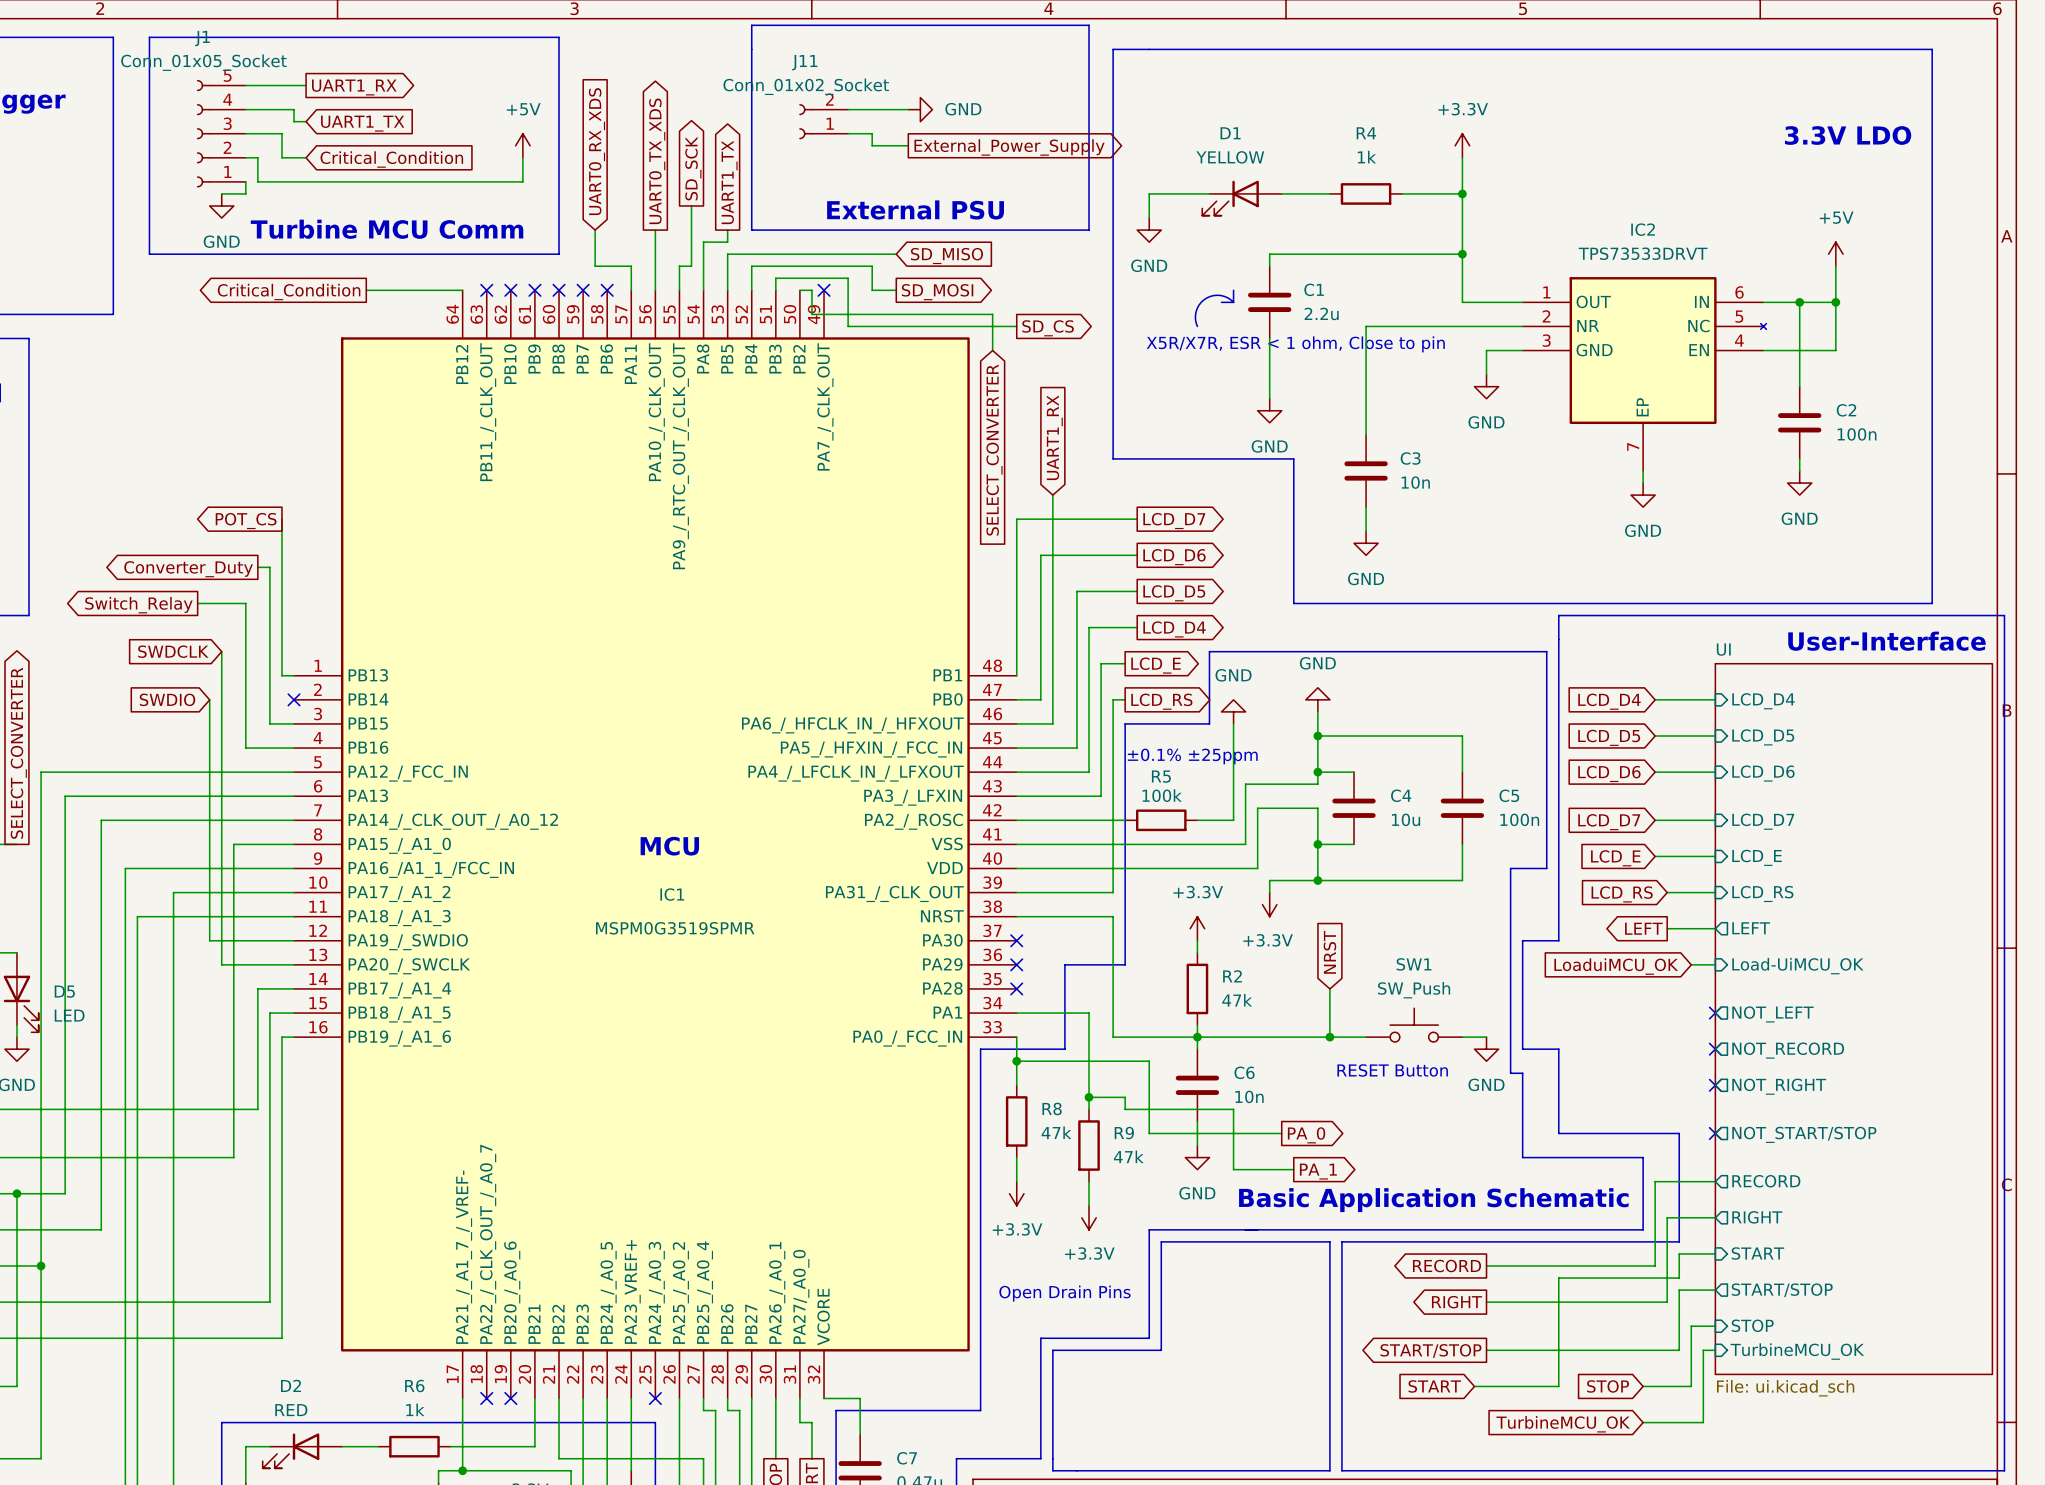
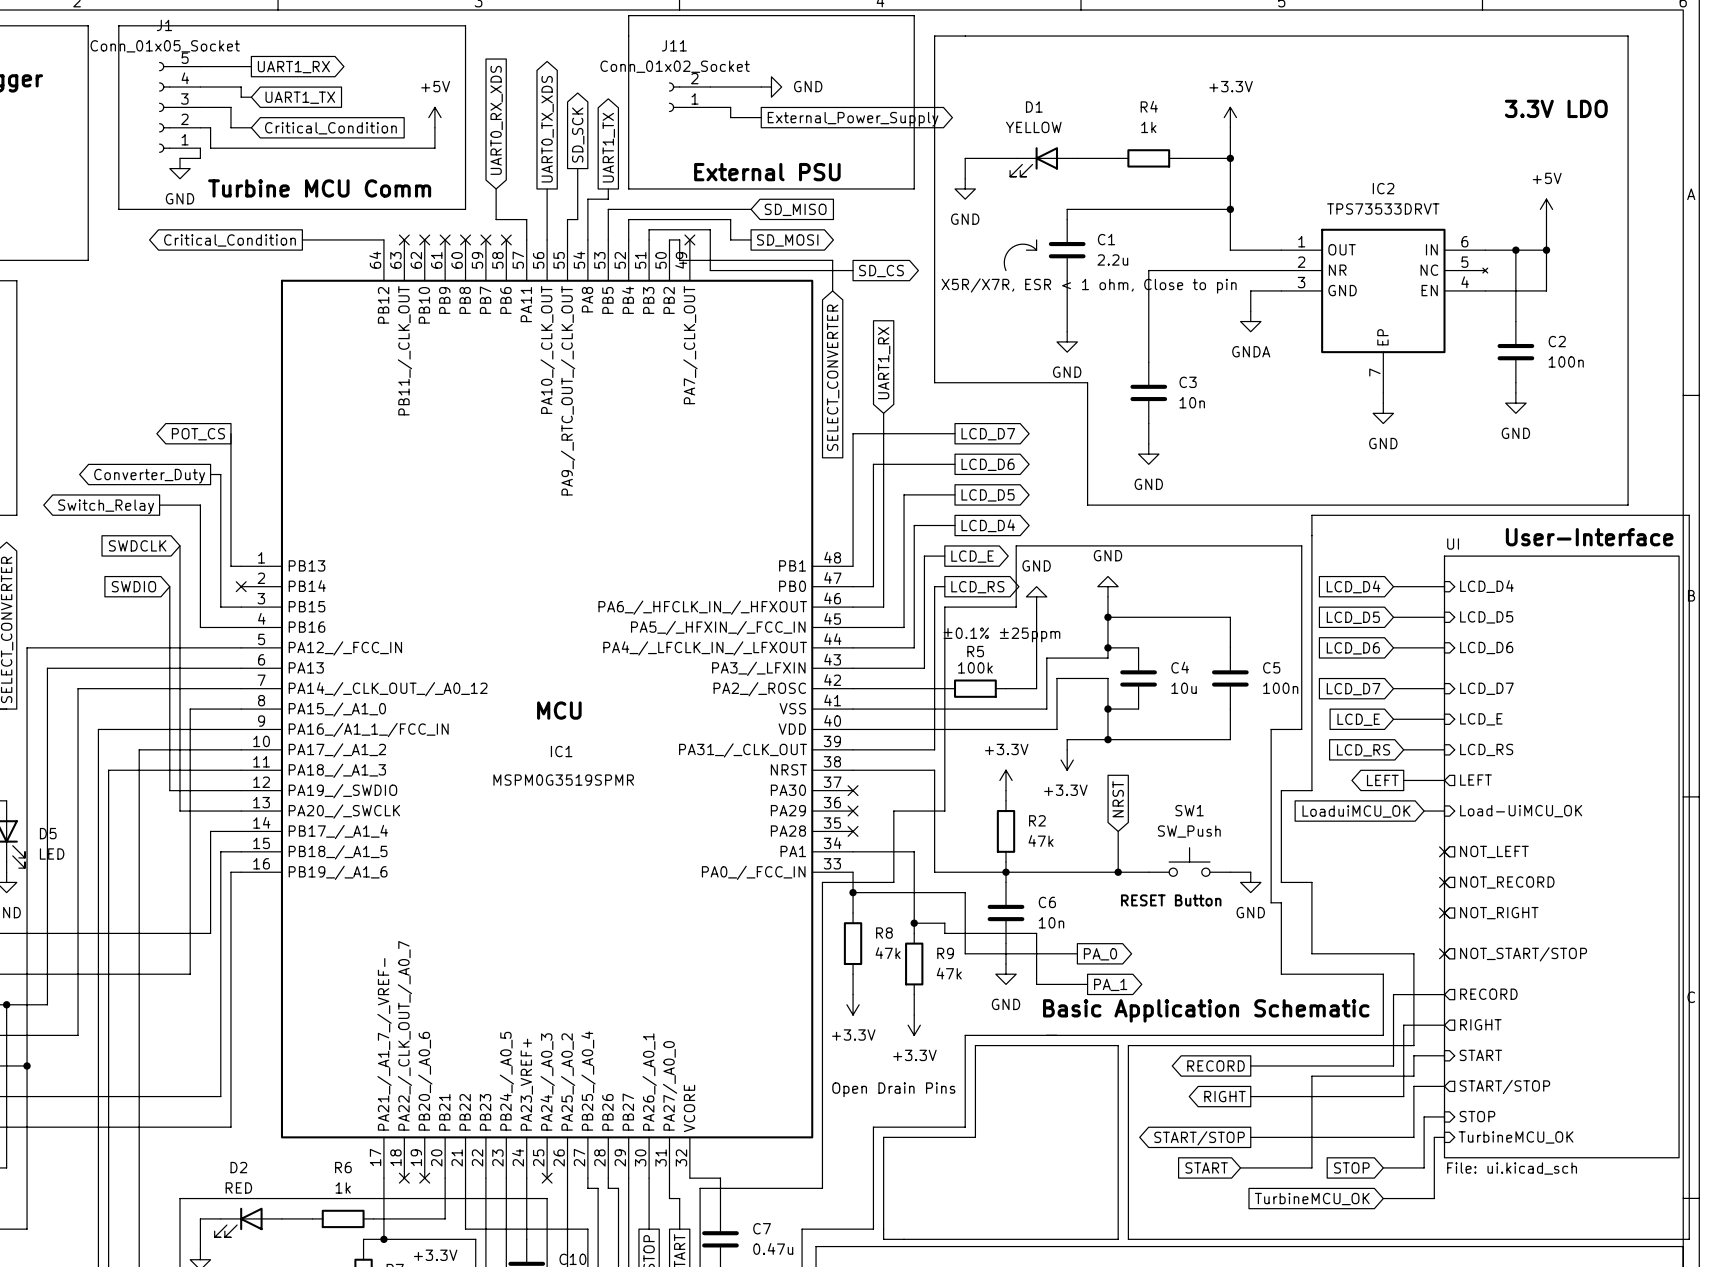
power symbol: GND (1486, 386) -> GNDA (1250, 321)

